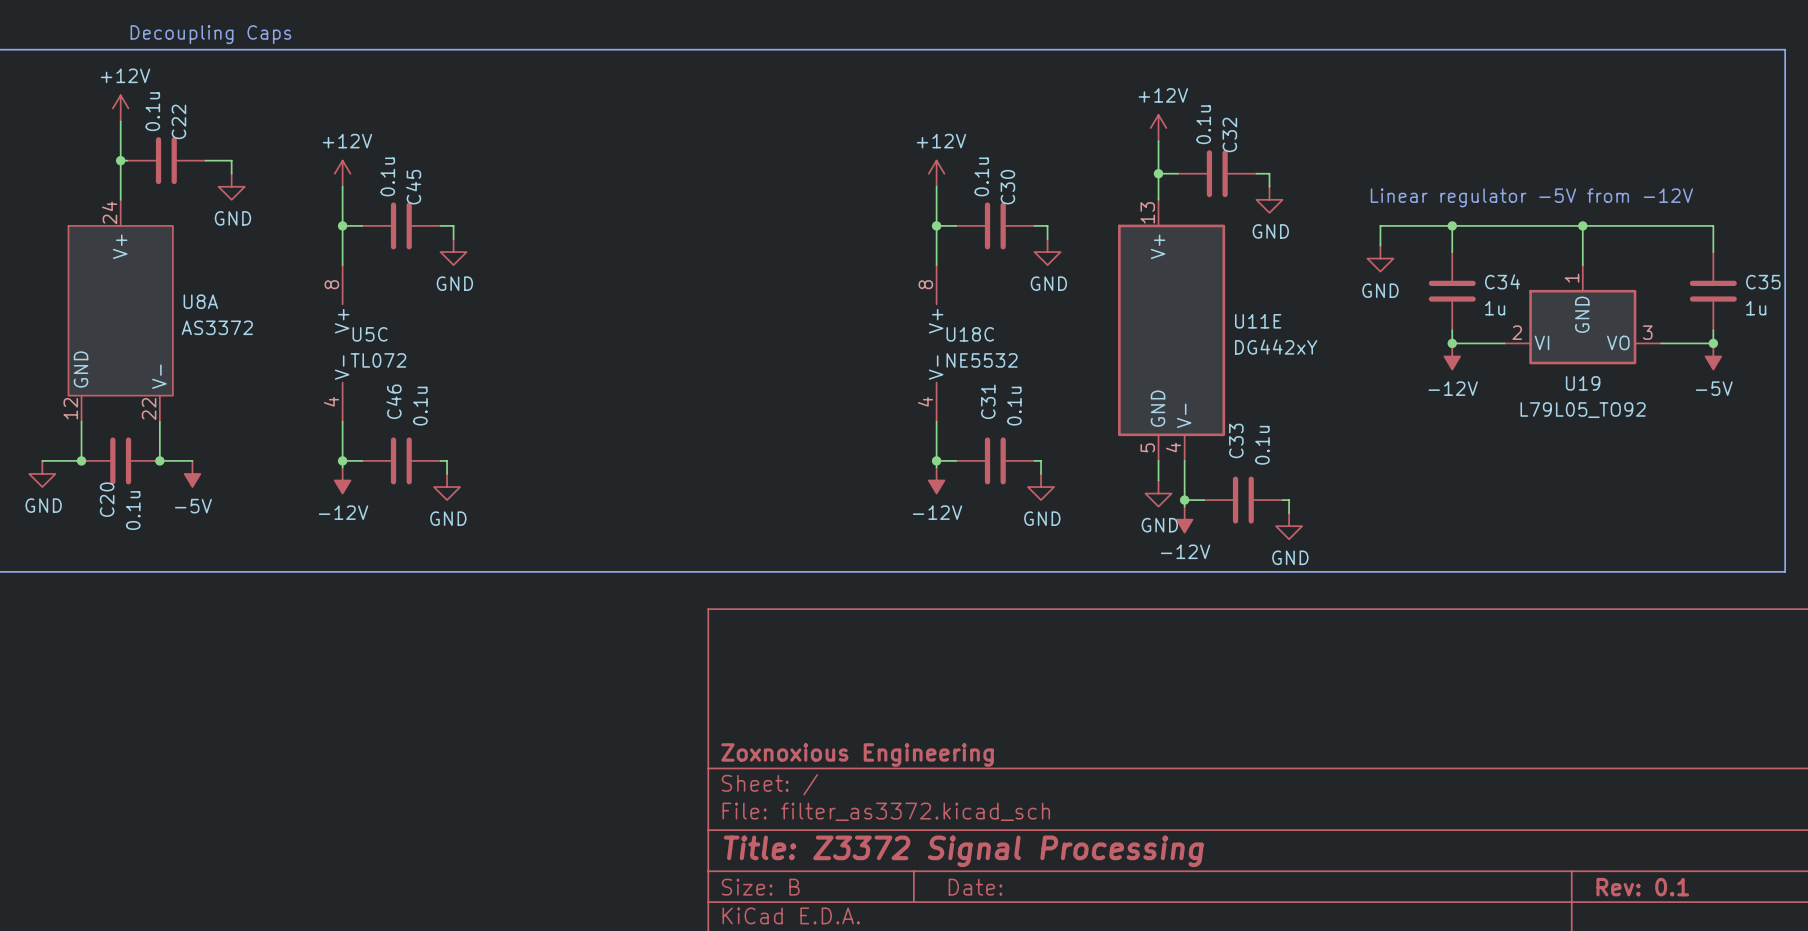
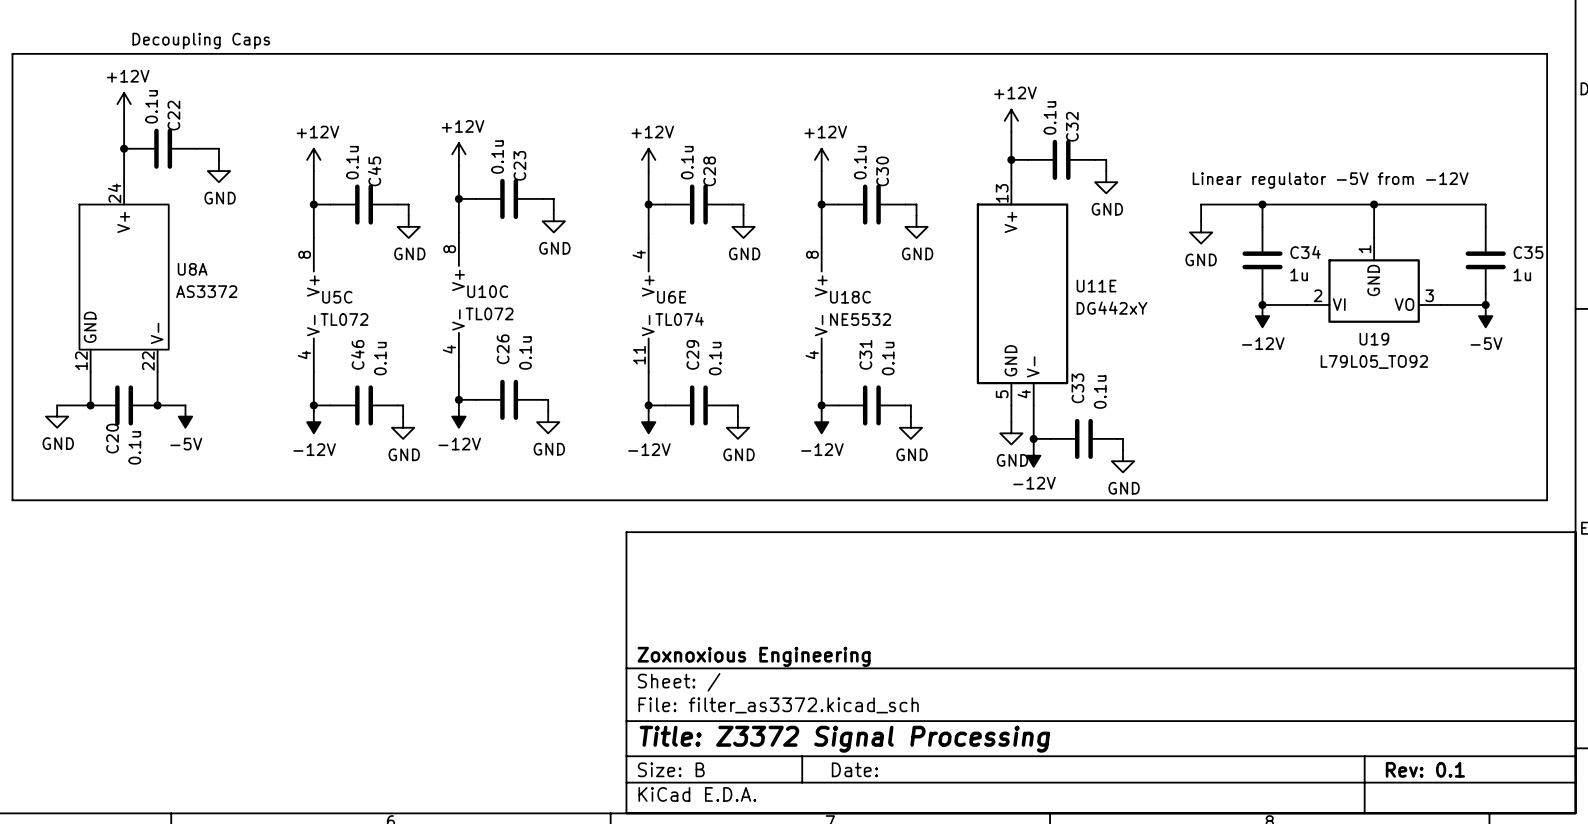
power symbol: none -> +12V (458, 154)
power symbol: none -> +12V (648, 159)
wire: none -> (458, 165) (458, 232)
wire: none -> (648, 171) (648, 238)
wire: none -> (458, 198) (475, 198)
junction: none -> (458, 198)
C23: none -> 0.1u (509, 198)
wire: none -> (542, 198) (553, 198) (553, 210)
wire: none -> (648, 204) (665, 204)
junction: none -> (648, 204)
C28: none -> 0.1u (698, 204)
wire: none -> (732, 204) (743, 204) (743, 215)
power symbol: none -> GND (553, 221)
power symbol: none -> GND (743, 226)
U10C: none -> TL072 (458, 299)
U6E: none -> TL074 (648, 304)
wire: none -> (458, 366) (458, 405)
wire: none -> (648, 371) (648, 411)
wire: none -> (458, 399) (475, 399)
junction: none -> (458, 399)
C26: none -> 0.1u (509, 399)
wire: none -> (542, 399) (548, 399) (548, 411)
wire: none -> (648, 405) (665, 405)
junction: none -> (648, 405)
C29: none -> 0.1u (698, 405)
wire: none -> (732, 405) (737, 405) (737, 416)
power symbol: none -> -12V (458, 416)
power symbol: none -> GND (548, 422)
power symbol: none -> -12V (648, 422)
power symbol: none -> GND (737, 427)

